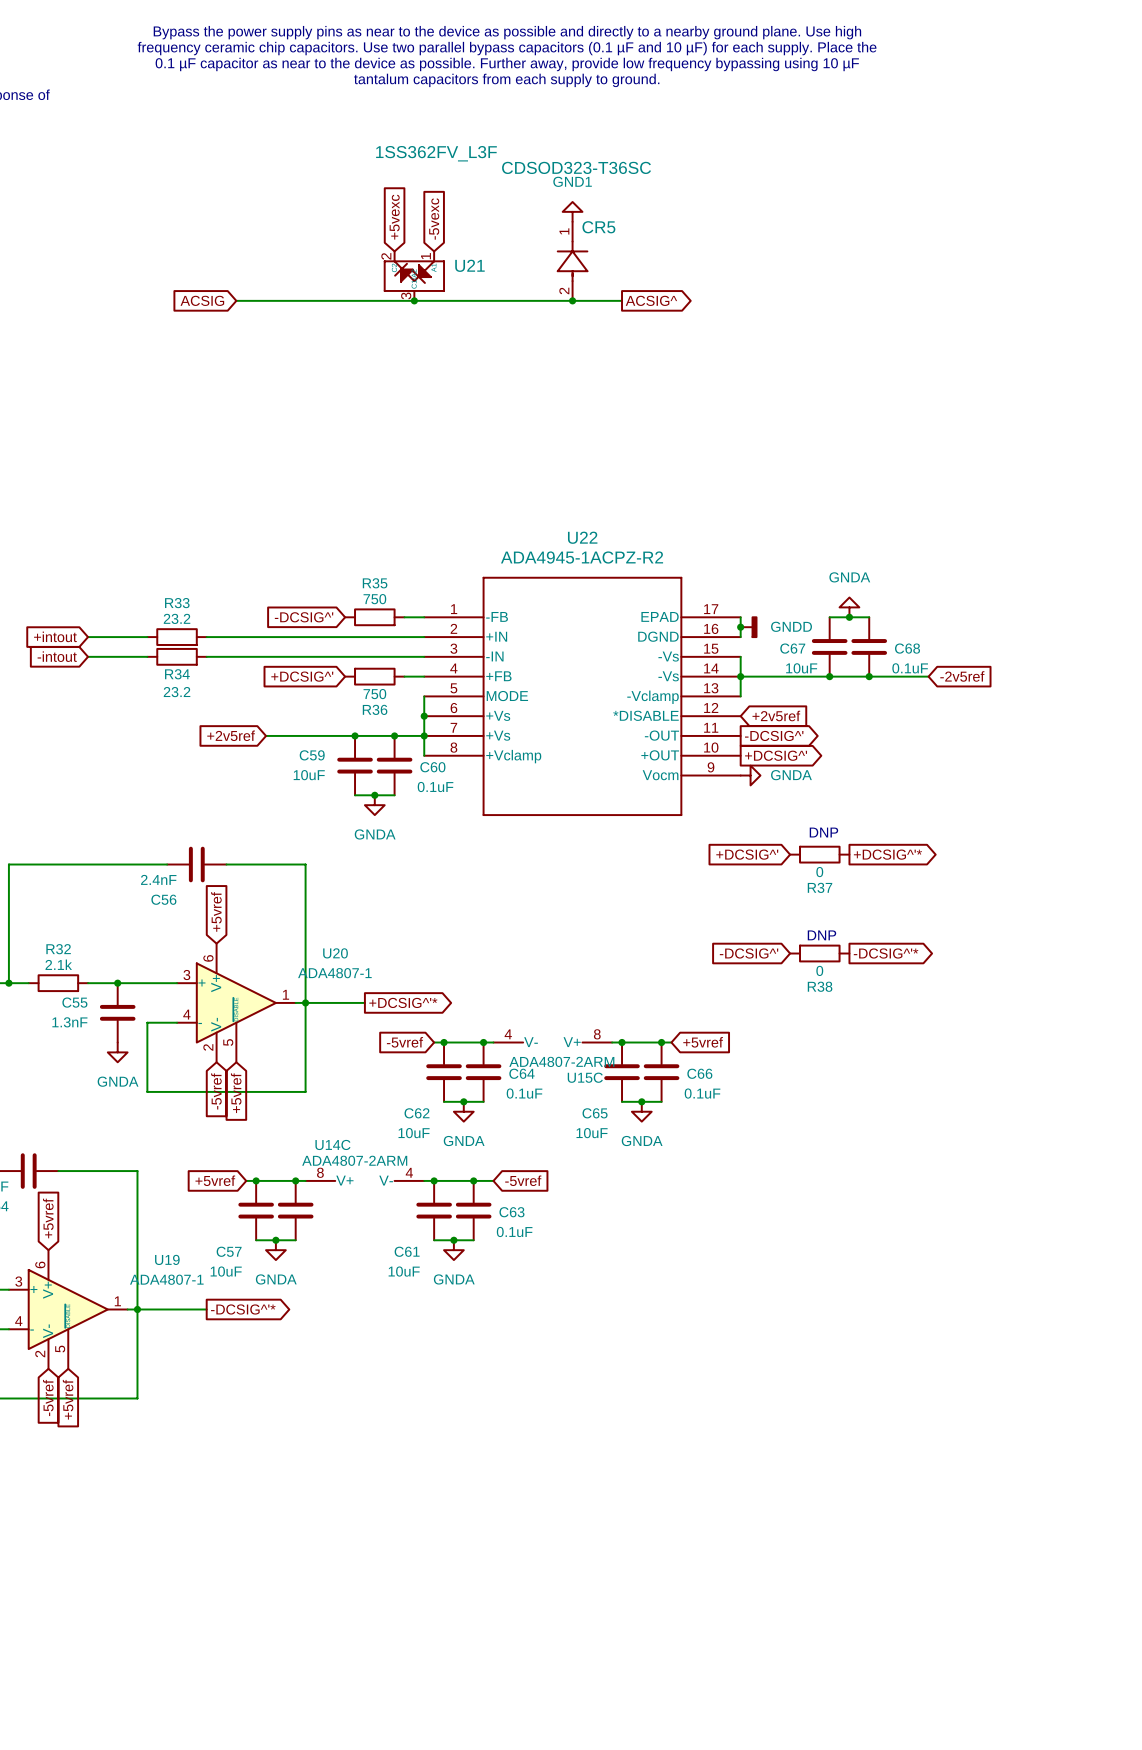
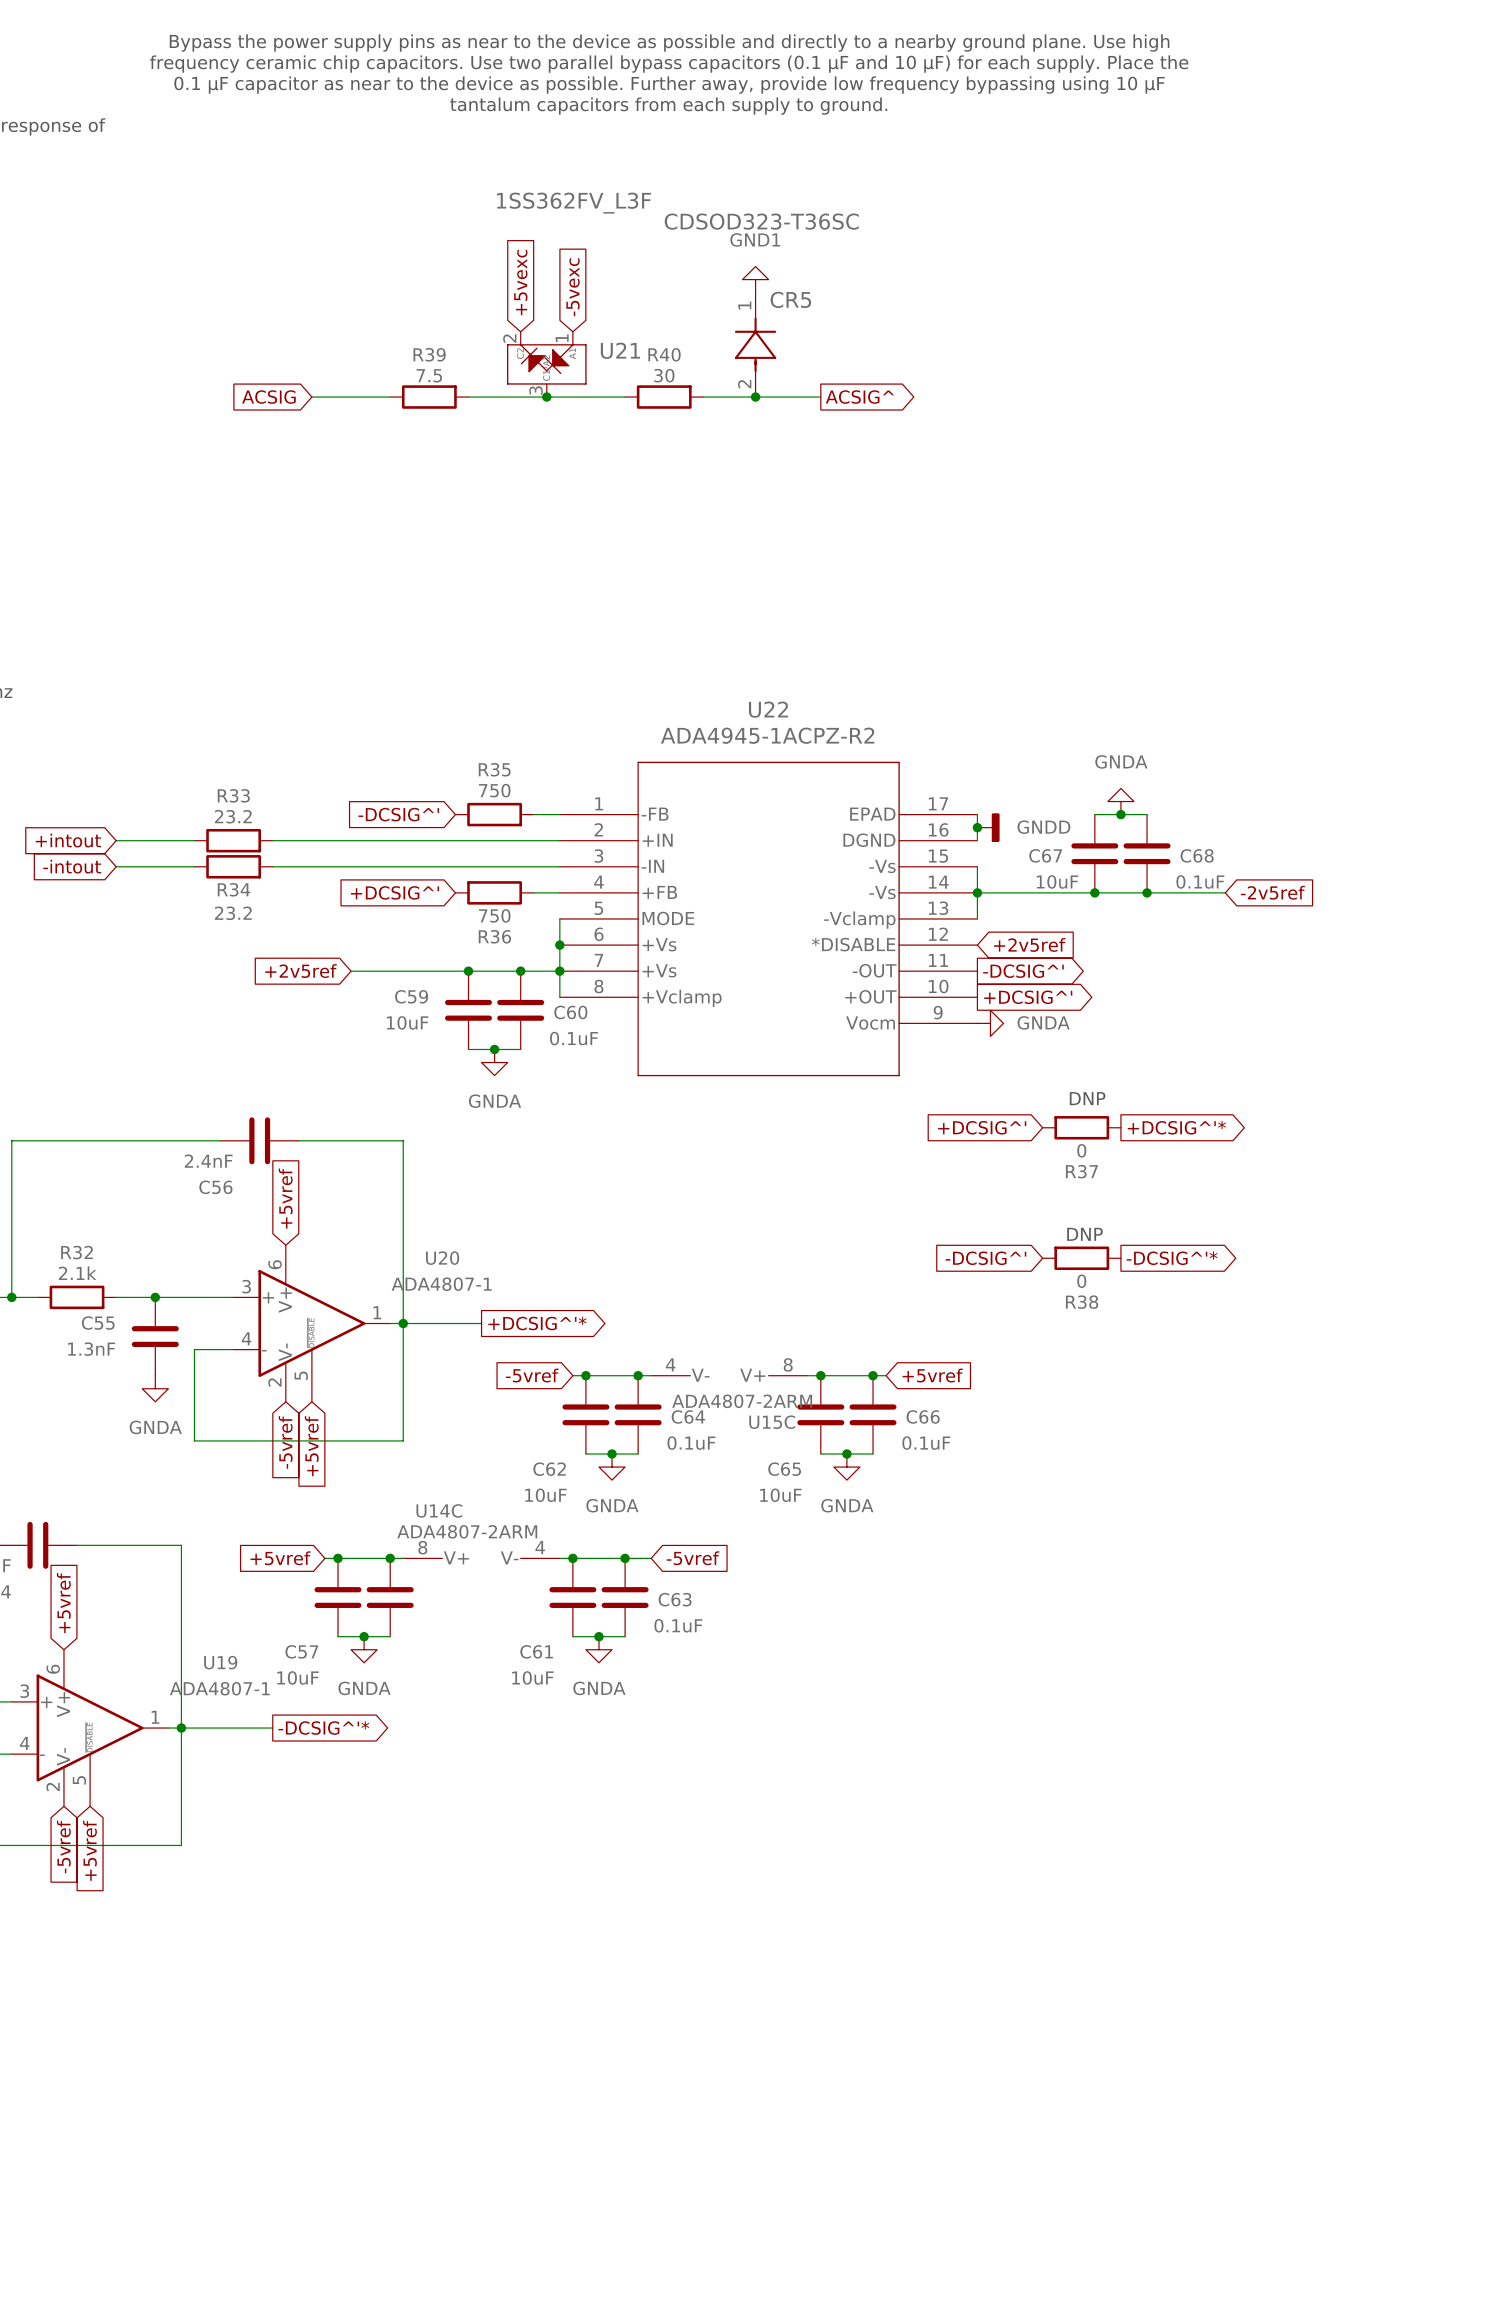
wire: (295, 300) (355, 300) -> none
R39: none -> 7.5 (429, 397)
wire: (473, 300) (533, 300) -> none
R40: none -> 30 (664, 397)

